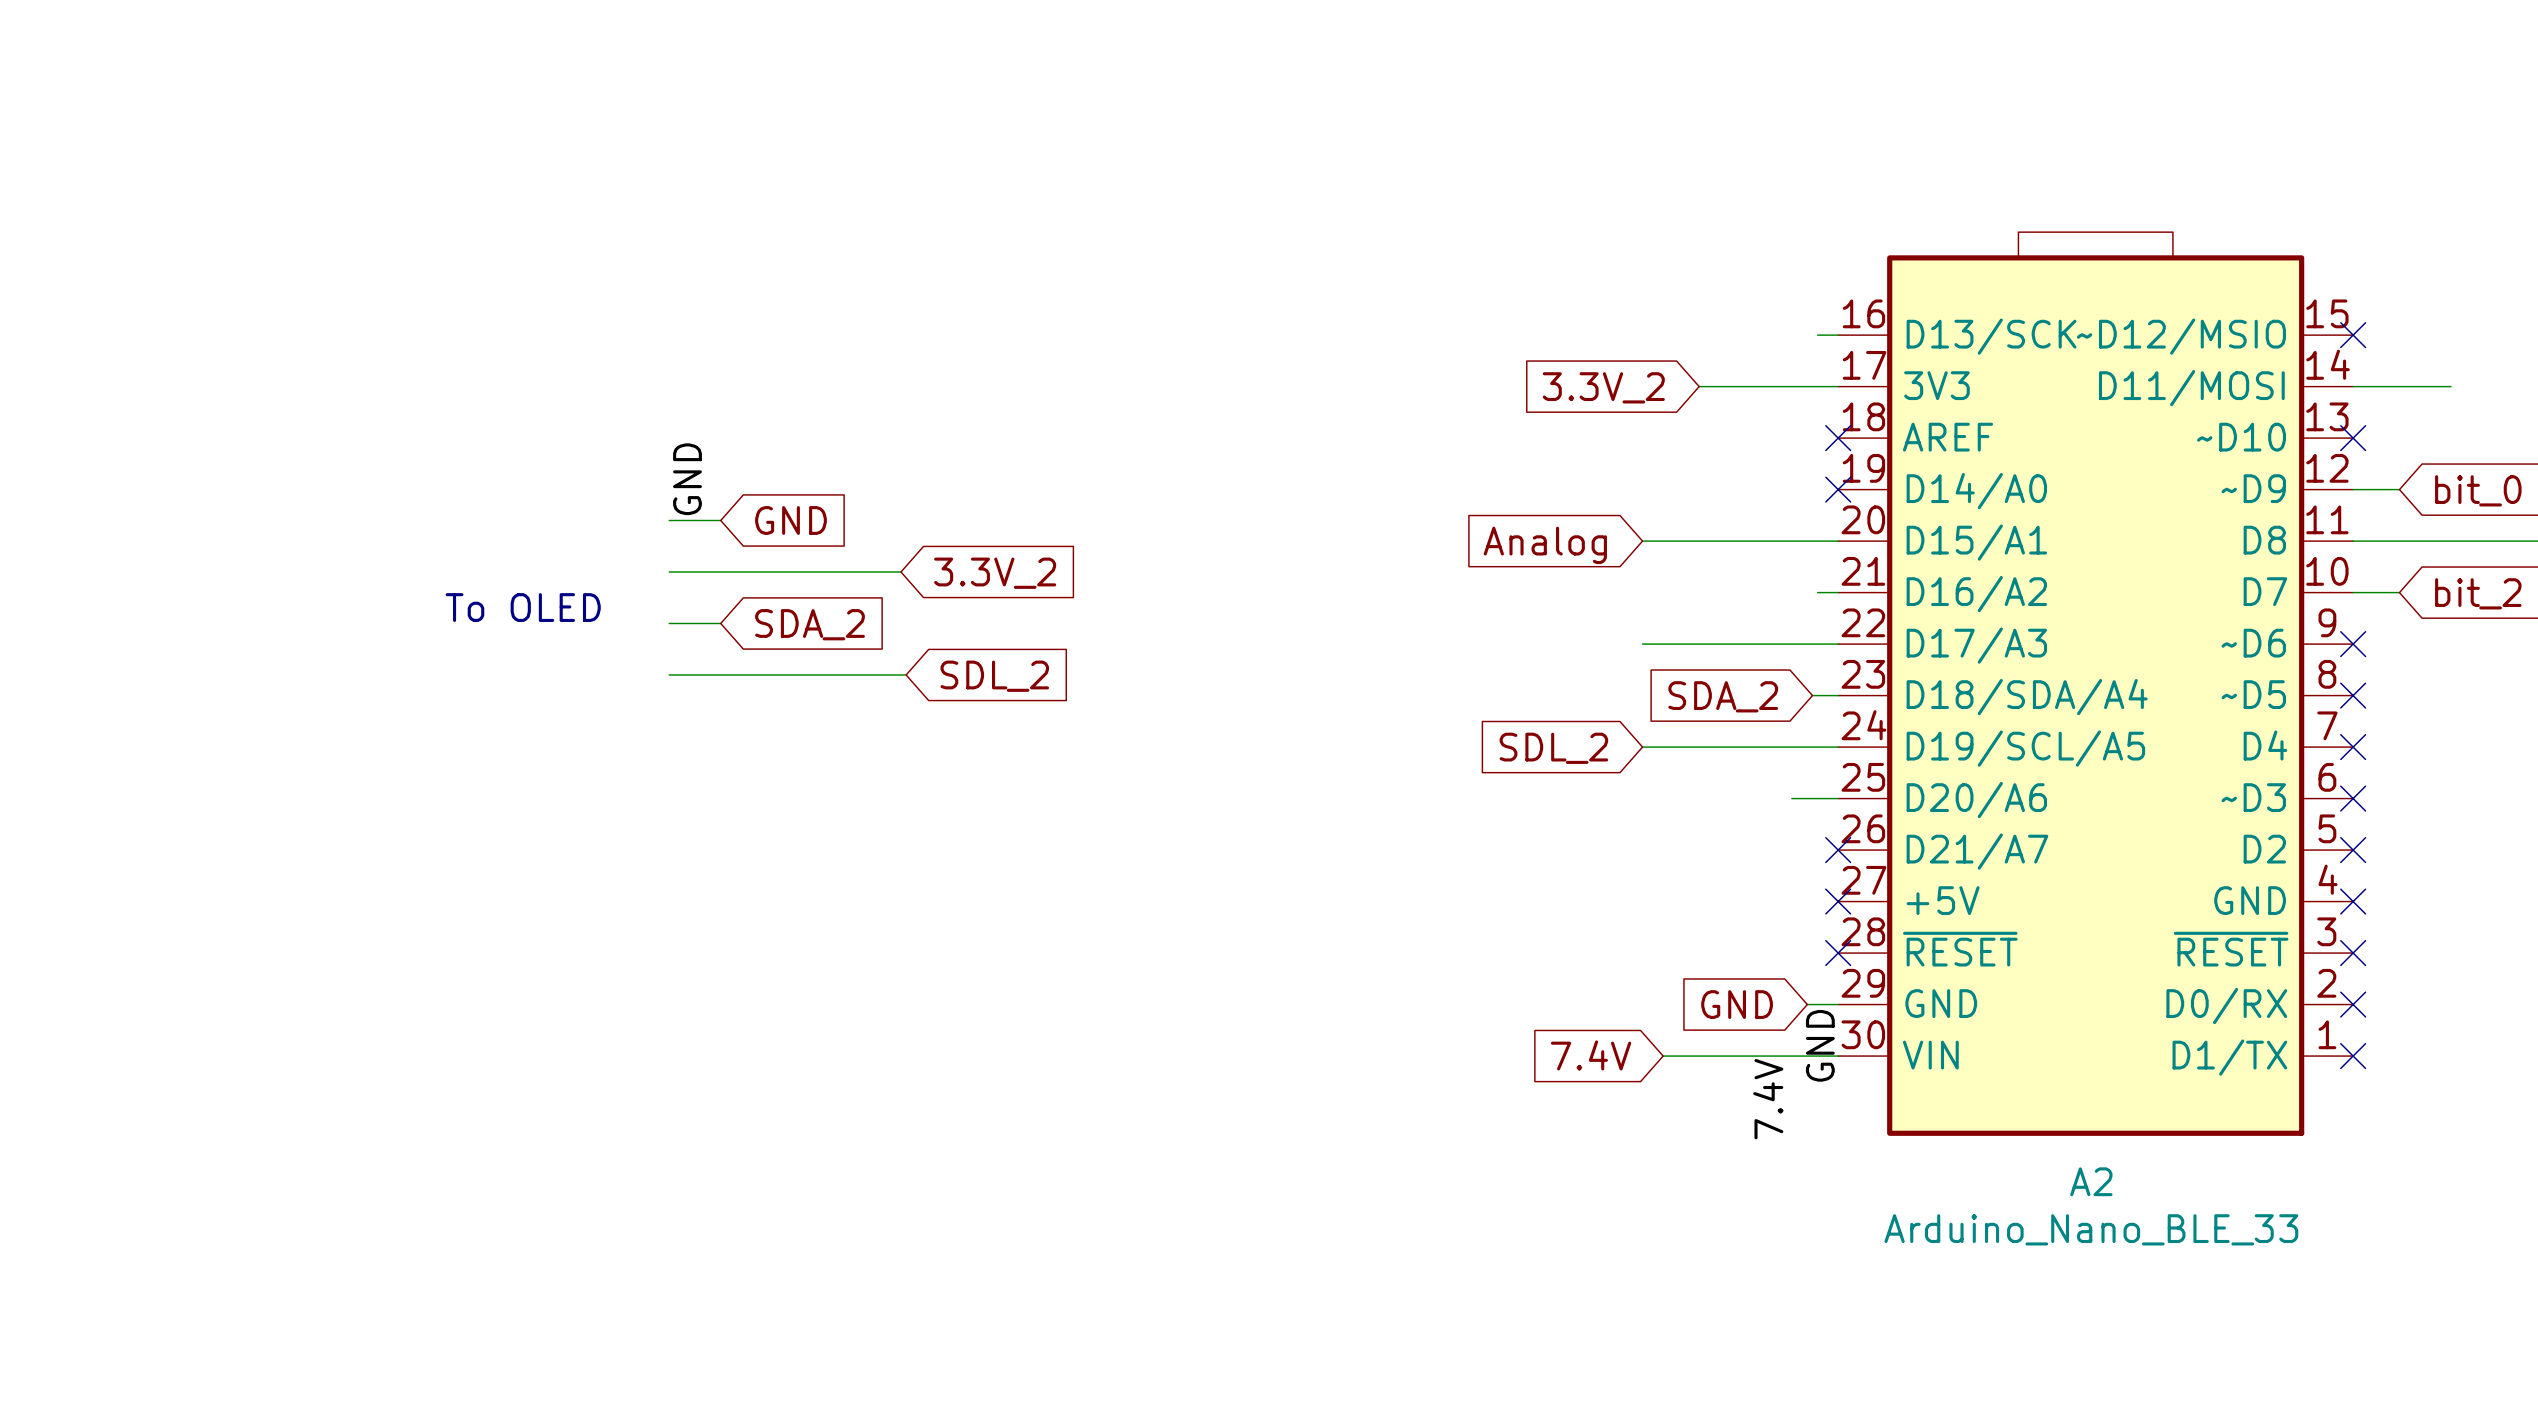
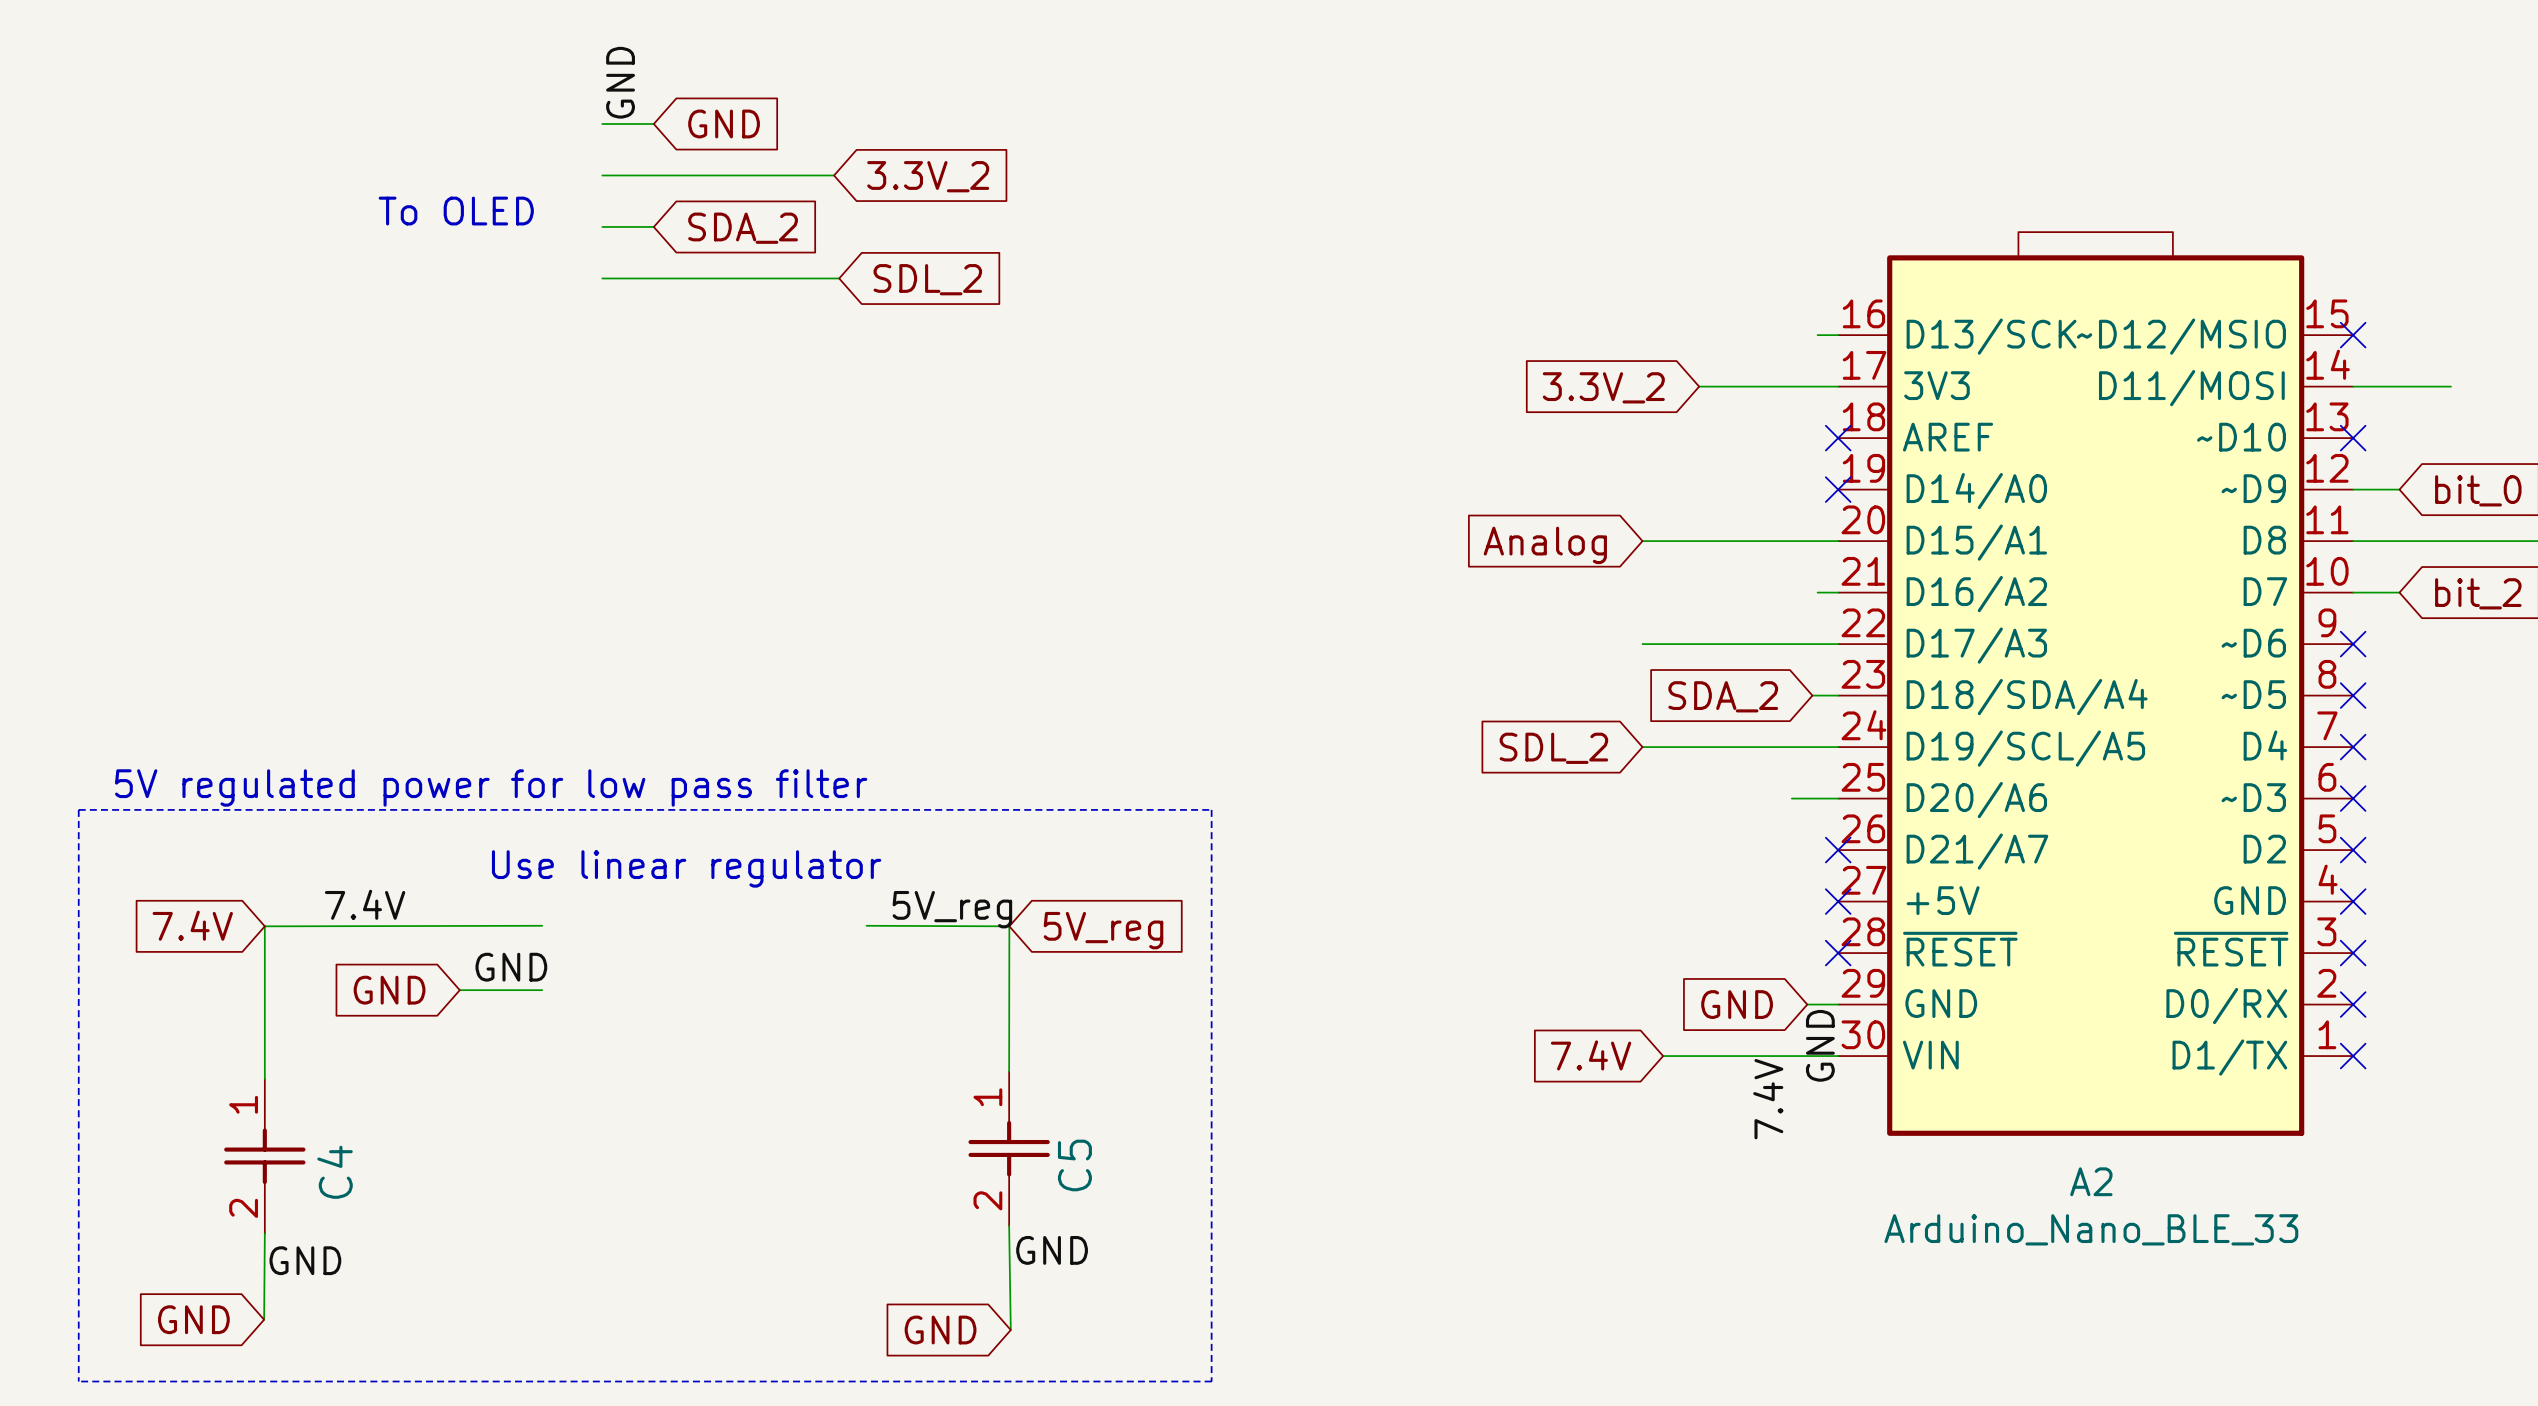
label: none -> GND (620, 82)
global label: none -> GND (724, 123)
label: GND (687, 479) -> none
wire: (669, 520) (720, 520) -> (602, 123) (653, 123)
global label: GND (791, 520) -> none
wire: (669, 571) (901, 571) -> (602, 175) (834, 175)
global label position: 3.3V_2 (995, 573) -> 3.3V_2 (928, 176)
text position: To OLED (523, 607) -> To OLED (456, 211)
wire: (669, 623) (720, 623) -> (602, 226) (653, 226)
global label position: SDA_2 (810, 624) -> SDA_2 (743, 228)
wire: (669, 674) (906, 674) -> (602, 278) (839, 278)
global label position: SDL_2 (994, 676) -> SDL_2 (927, 279)
text: none -> 5V regulated power for low pass filter (491, 787)
line: none -> (78, 809) (78, 1381) (1211, 1381) (1211, 809) (78, 809)
text: none -> Use linear regulator (686, 868)
label: none -> 7.4V (365, 904)
label: none -> 5V_reg (952, 909)
global label: none -> 7.4V (192, 925)
wire: none -> (542, 925) (264, 926) (264, 1079)
wire: none -> (866, 925) (1009, 926) (1009, 1071)
global label: none -> 5V_reg (1103, 930)
label: none -> GND (511, 967)
global label: none -> GND (389, 990)
wire: none -> (459, 990) (542, 990)
C5: none -> (1009, 1148)
C4: none -> (264, 1156)
wire: none -> (1009, 1225) (1010, 1330)
wire: none -> (264, 1233) (264, 1319)
label: none -> GND (1052, 1250)
label: none -> GND (305, 1260)
global label: none -> GND (193, 1319)
global label: none -> GND (940, 1330)

